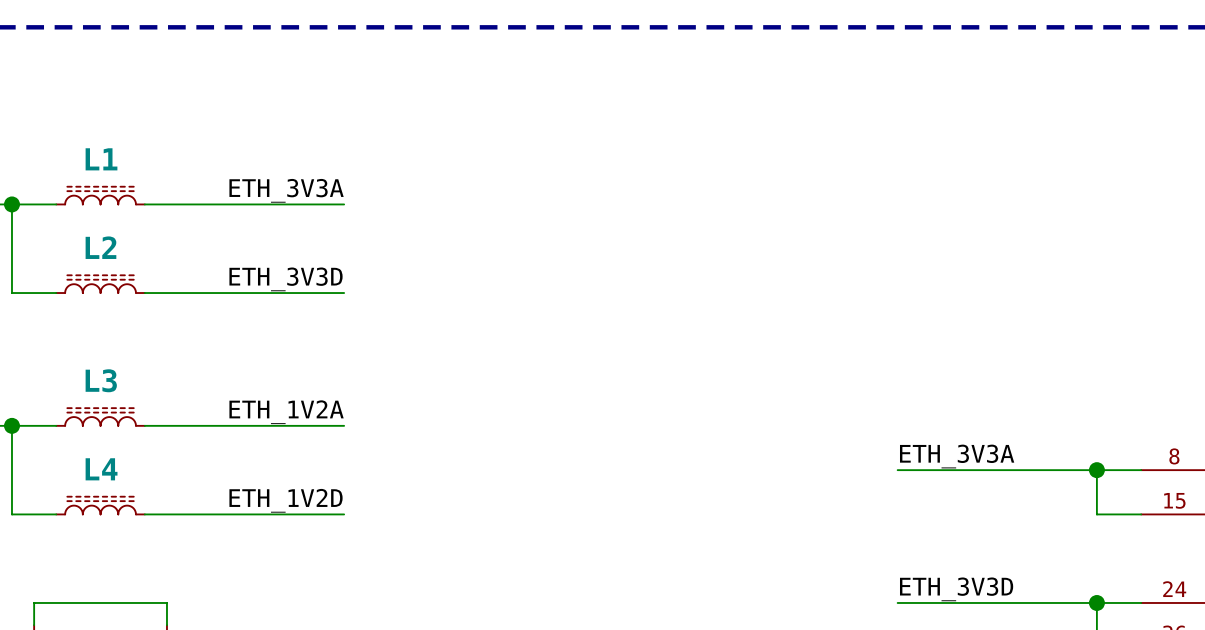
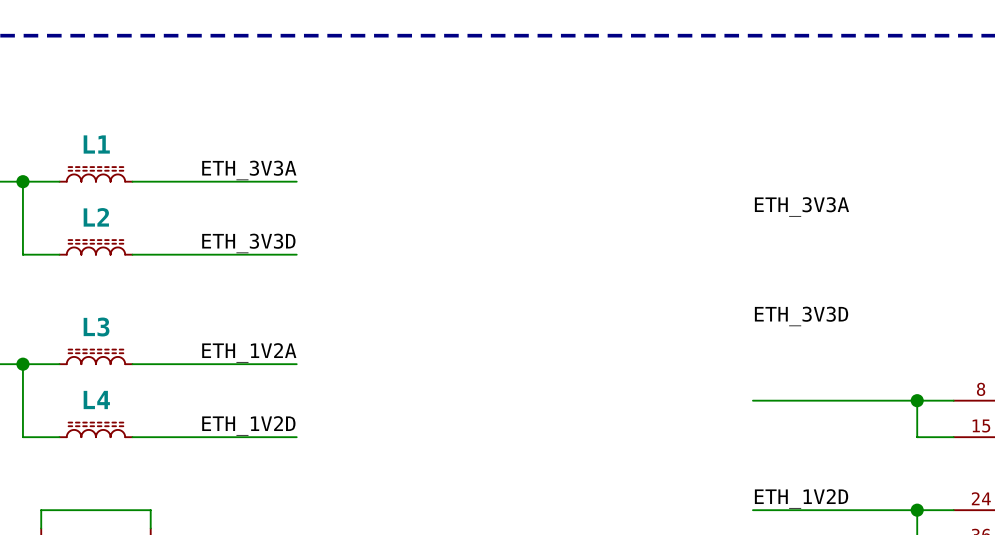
label: none -> ETH_3V3D (801, 316)
label position: ETH_3V3A (957, 456) -> ETH_3V3A (801, 206)
label: ETH_3V3D (956, 589) -> ETH_1V2D (801, 498)

